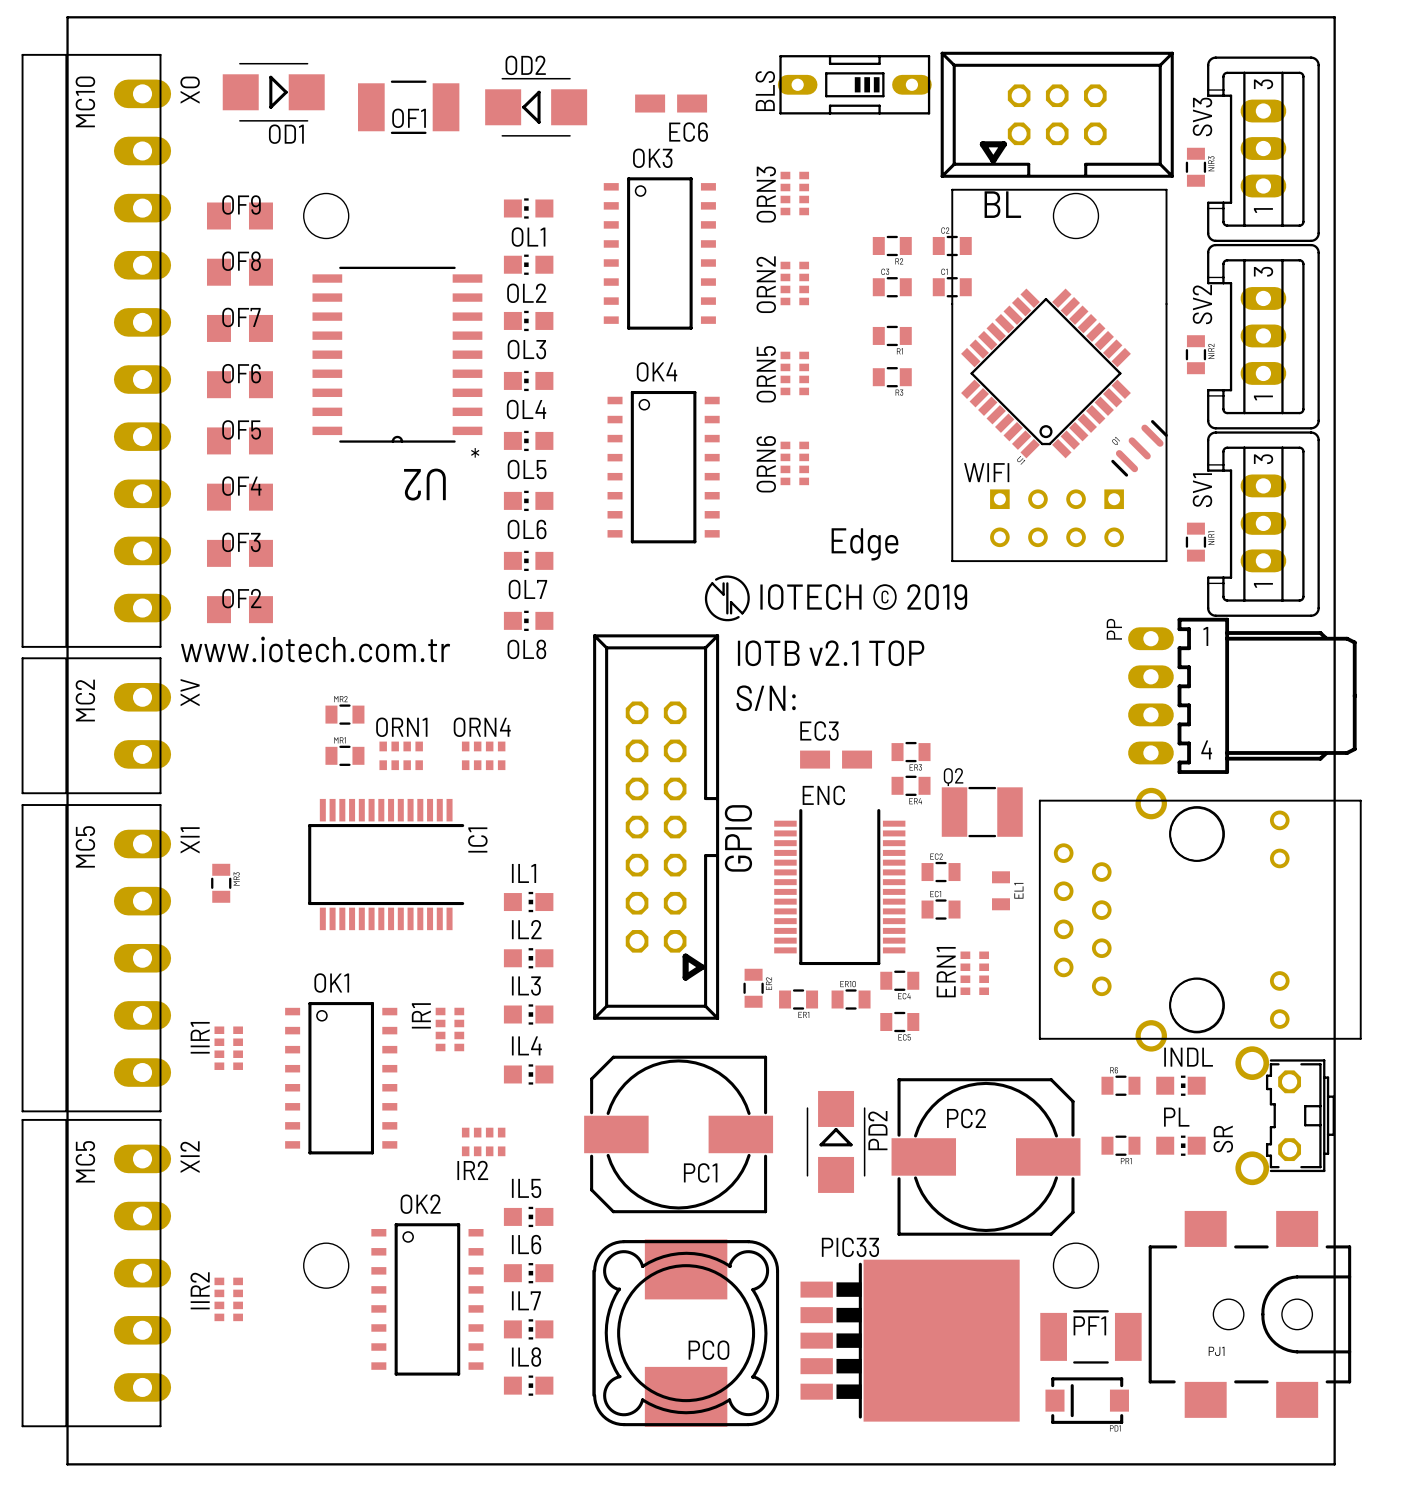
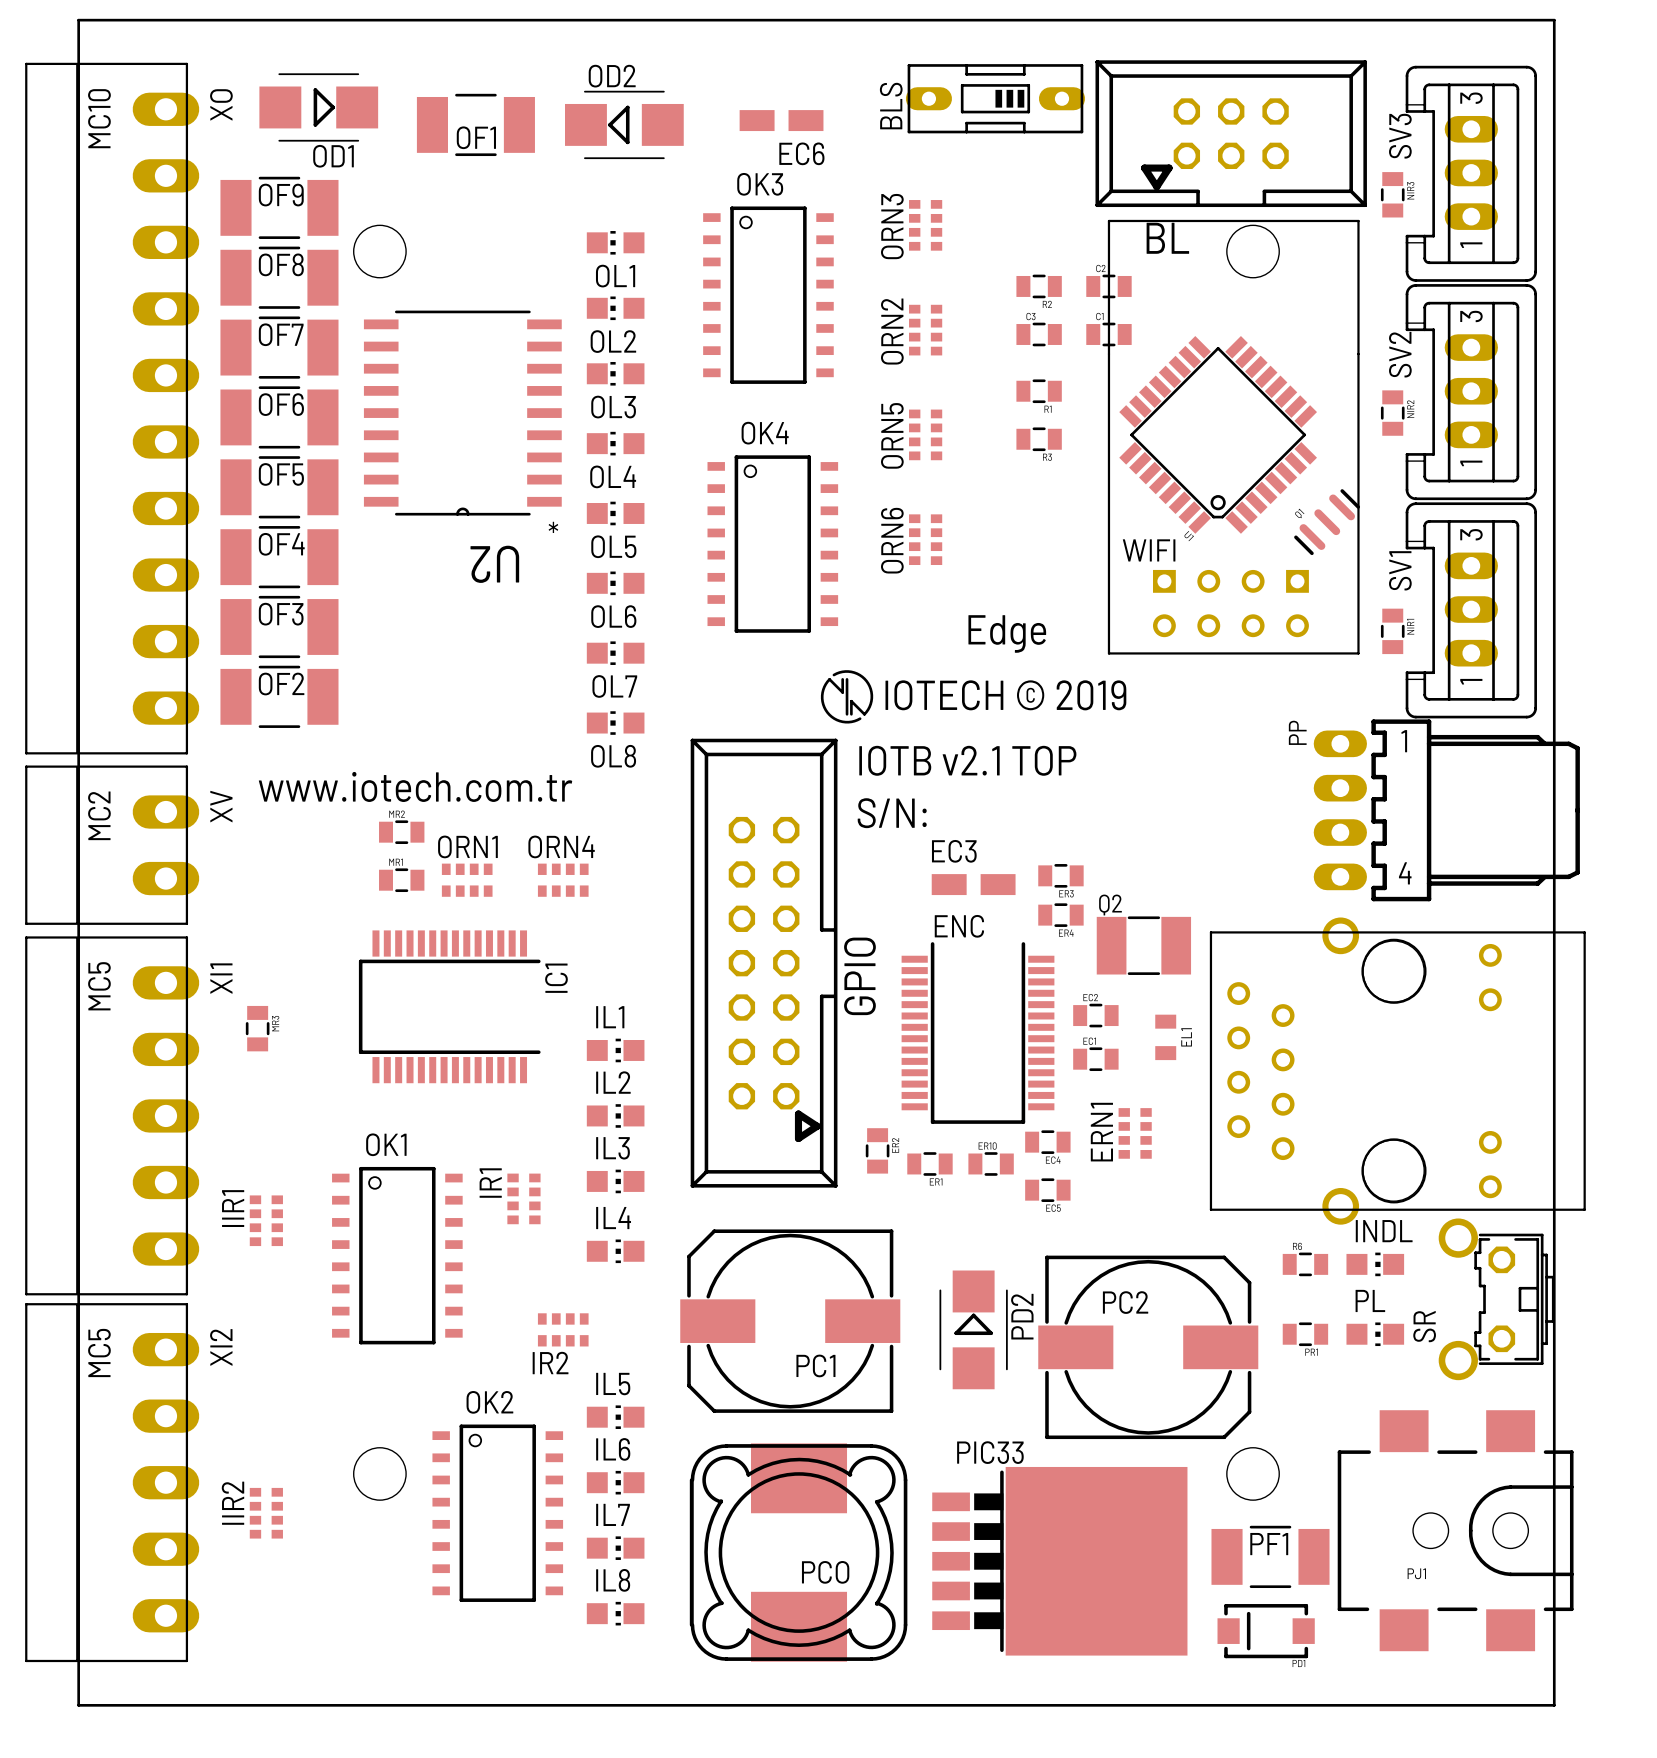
OF9 footprint: [206, 202, 273, 230] -> [220, 176, 339, 239]
OF8 footprint: [206, 258, 273, 286] -> [220, 246, 339, 309]
OF7 footprint: [206, 314, 273, 342] -> [220, 316, 339, 379]
OF6 footprint: [206, 371, 273, 399] -> [220, 386, 339, 449]
OF5 footprint: [206, 427, 273, 455] -> [220, 456, 339, 519]
OF4 footprint: [206, 483, 273, 511] -> [220, 526, 339, 589]
OF3 footprint: [206, 539, 273, 567] -> [220, 595, 339, 659]
OF2 footprint: [206, 596, 273, 624] -> [220, 665, 339, 728]
text position: www.iotech.com.tr (315, 649) -> www.iotech.com.tr (415, 786)

